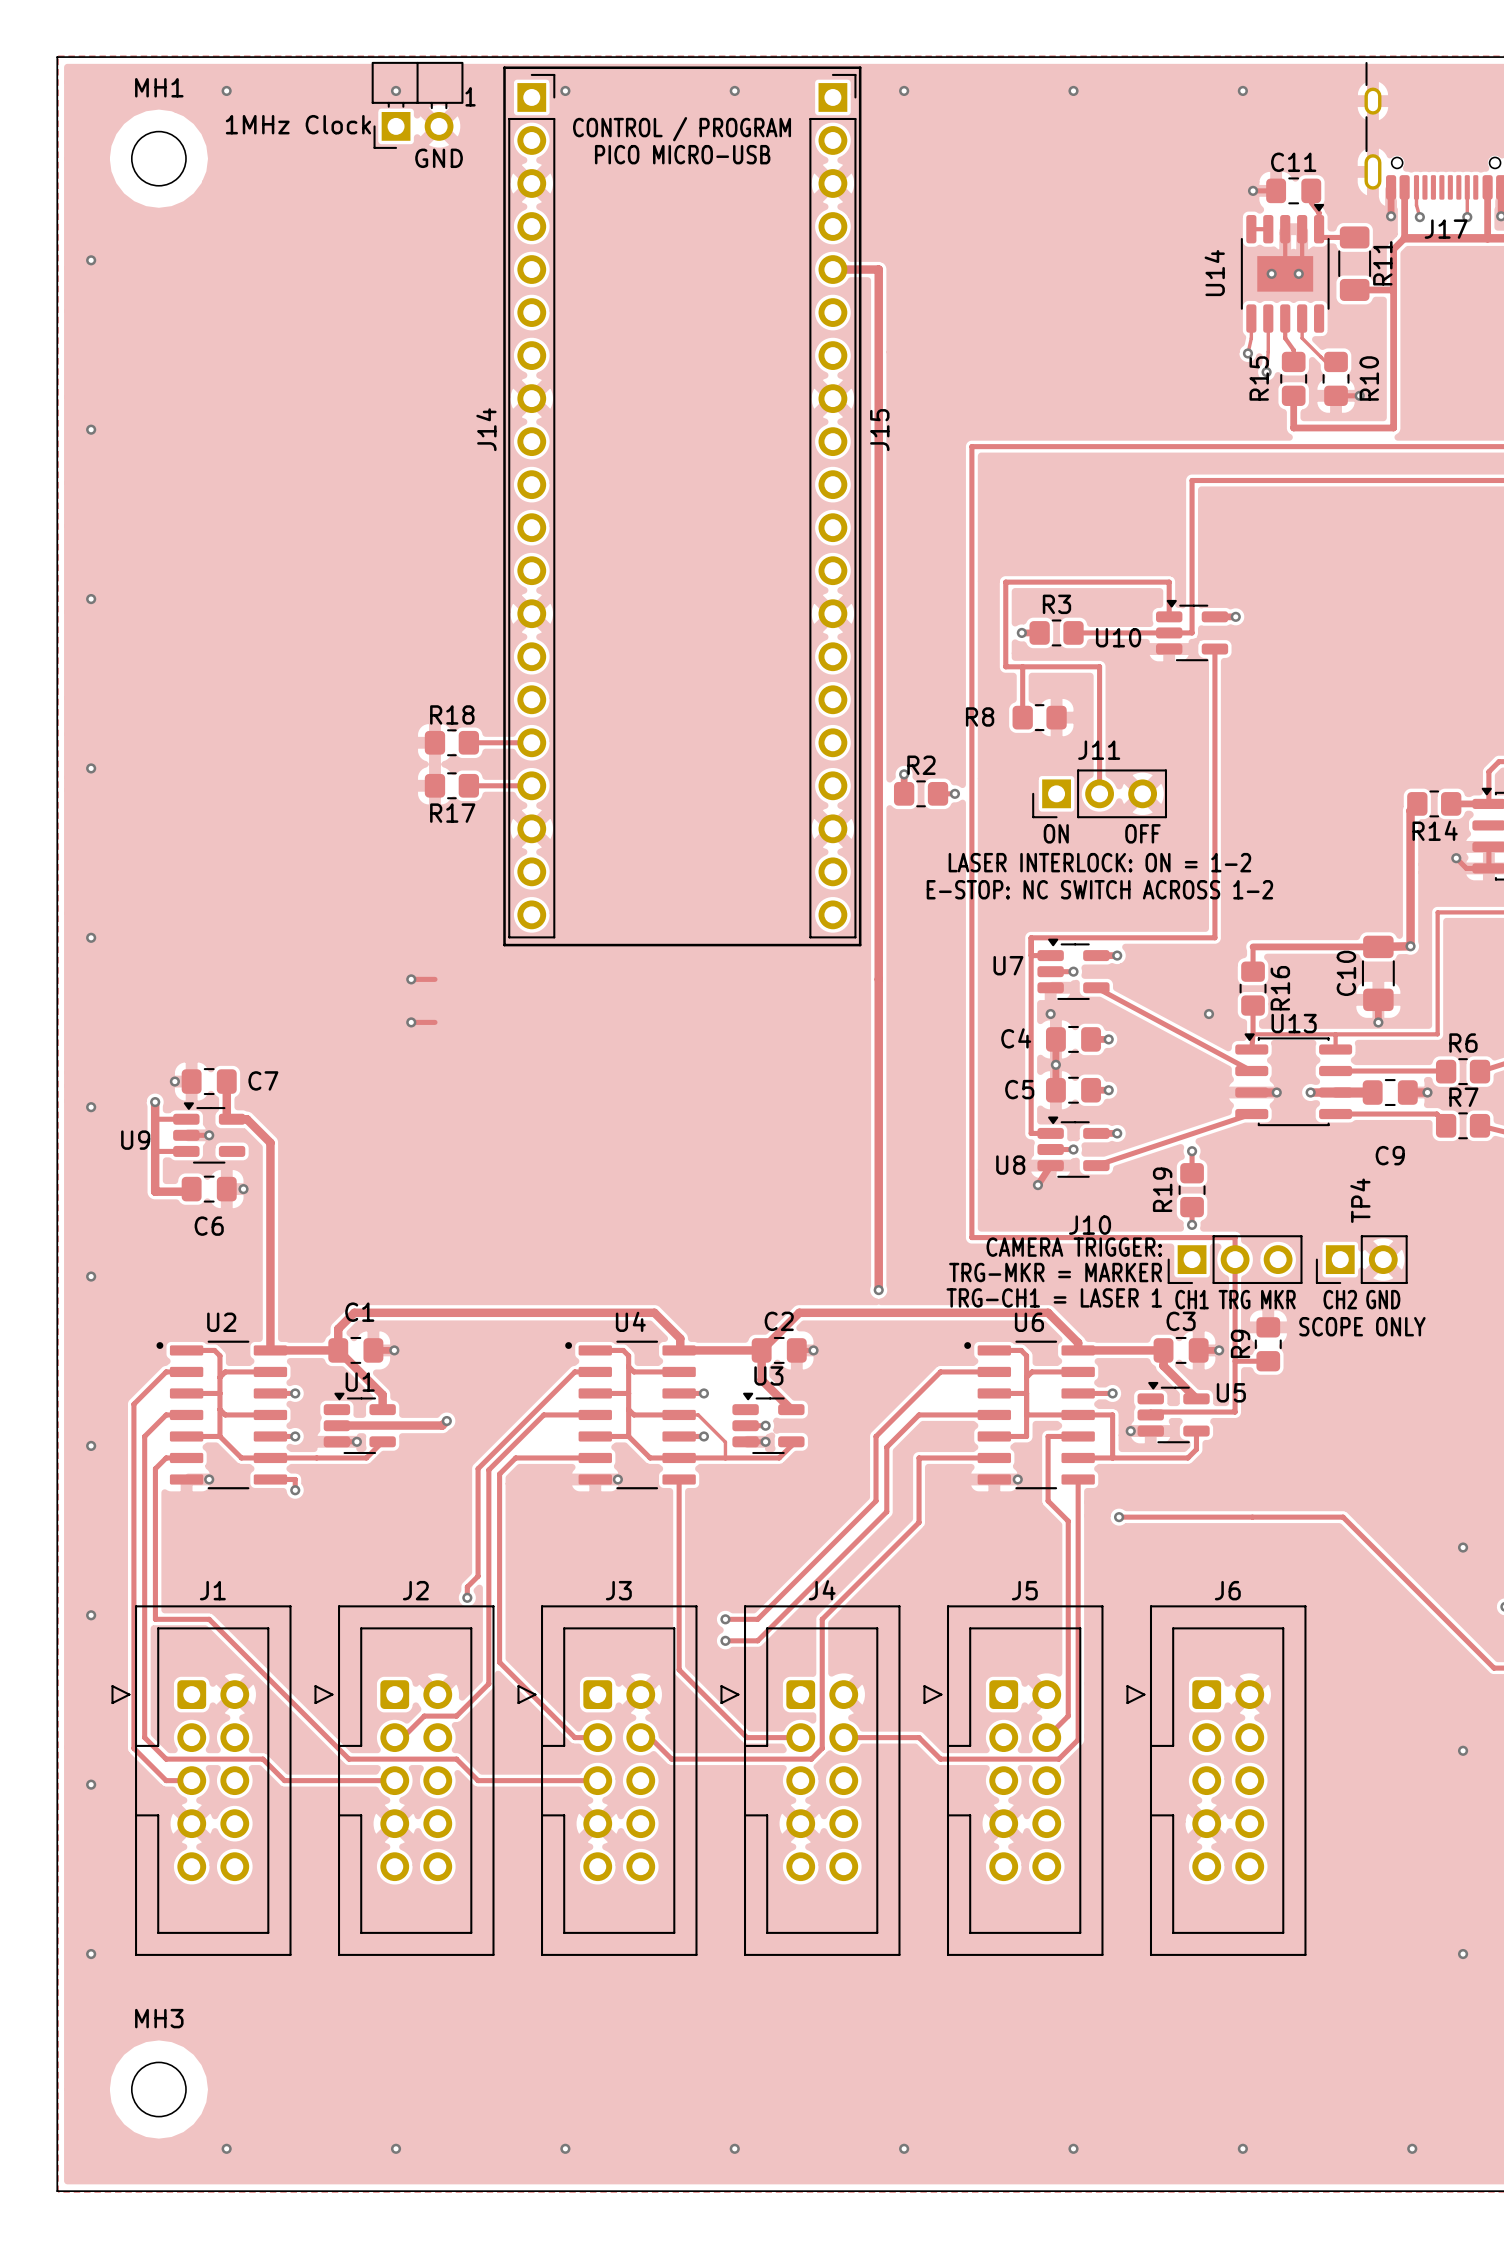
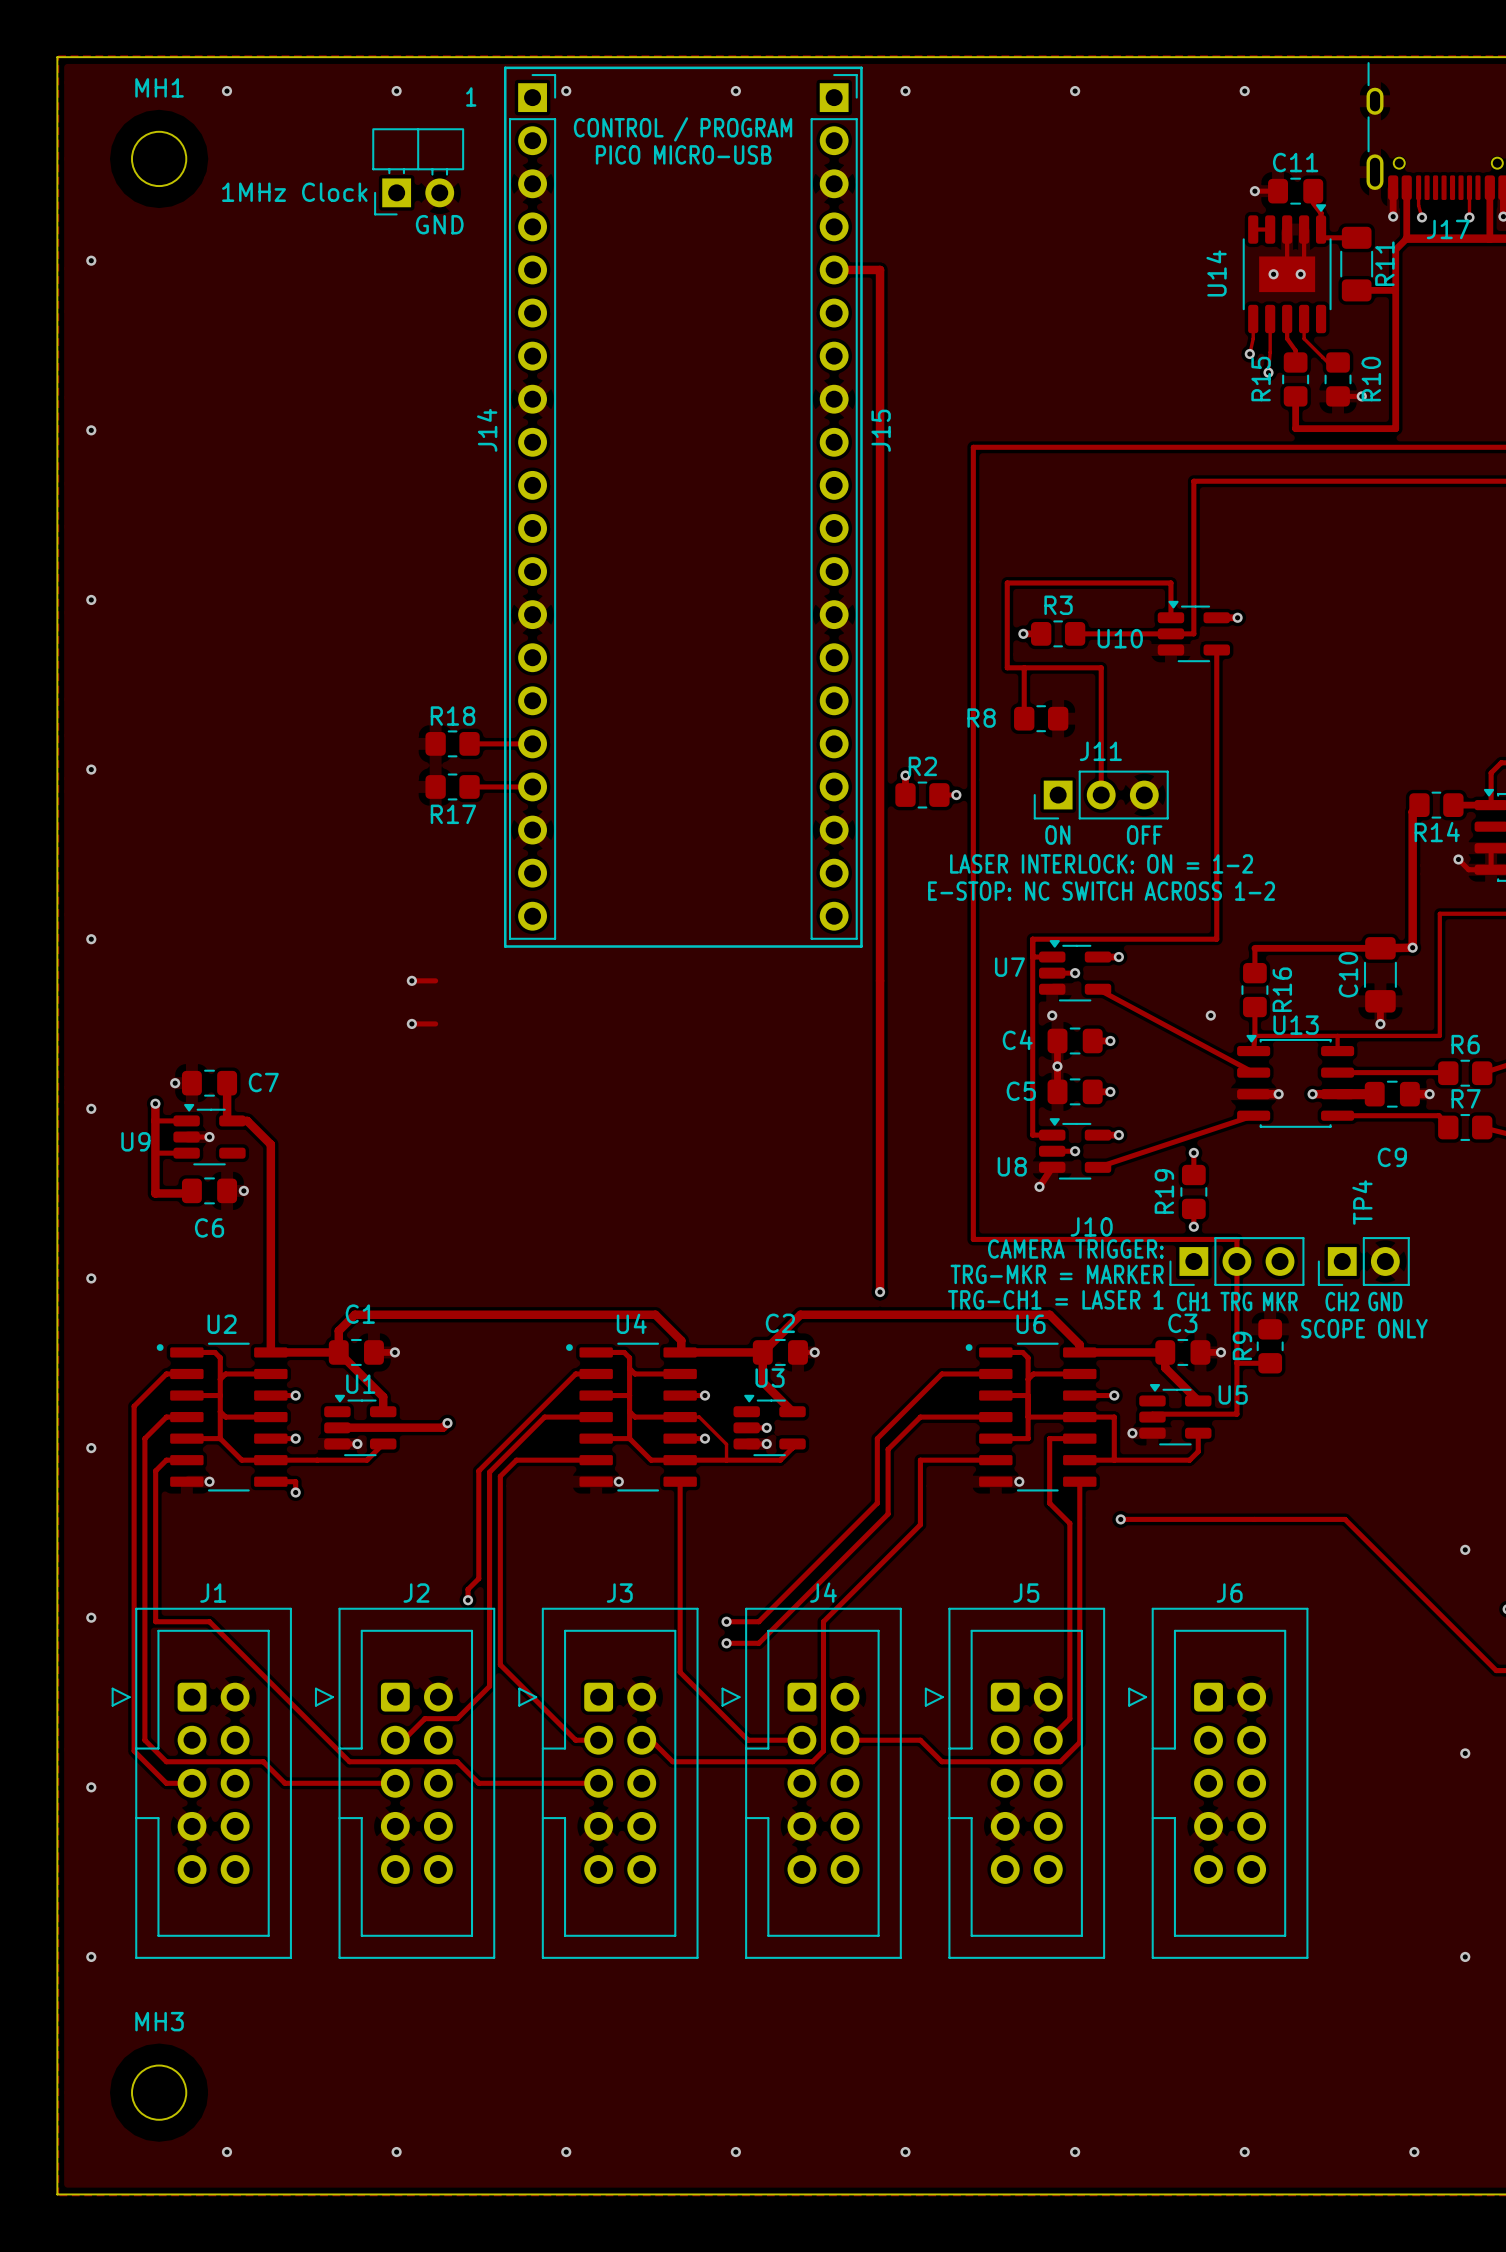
part position: (417, 105) -> (418, 171)
text position: 1MHz Clock (298, 124) -> 1MHz Clock (294, 192)
text position: GND (439, 158) -> GND (439, 224)

